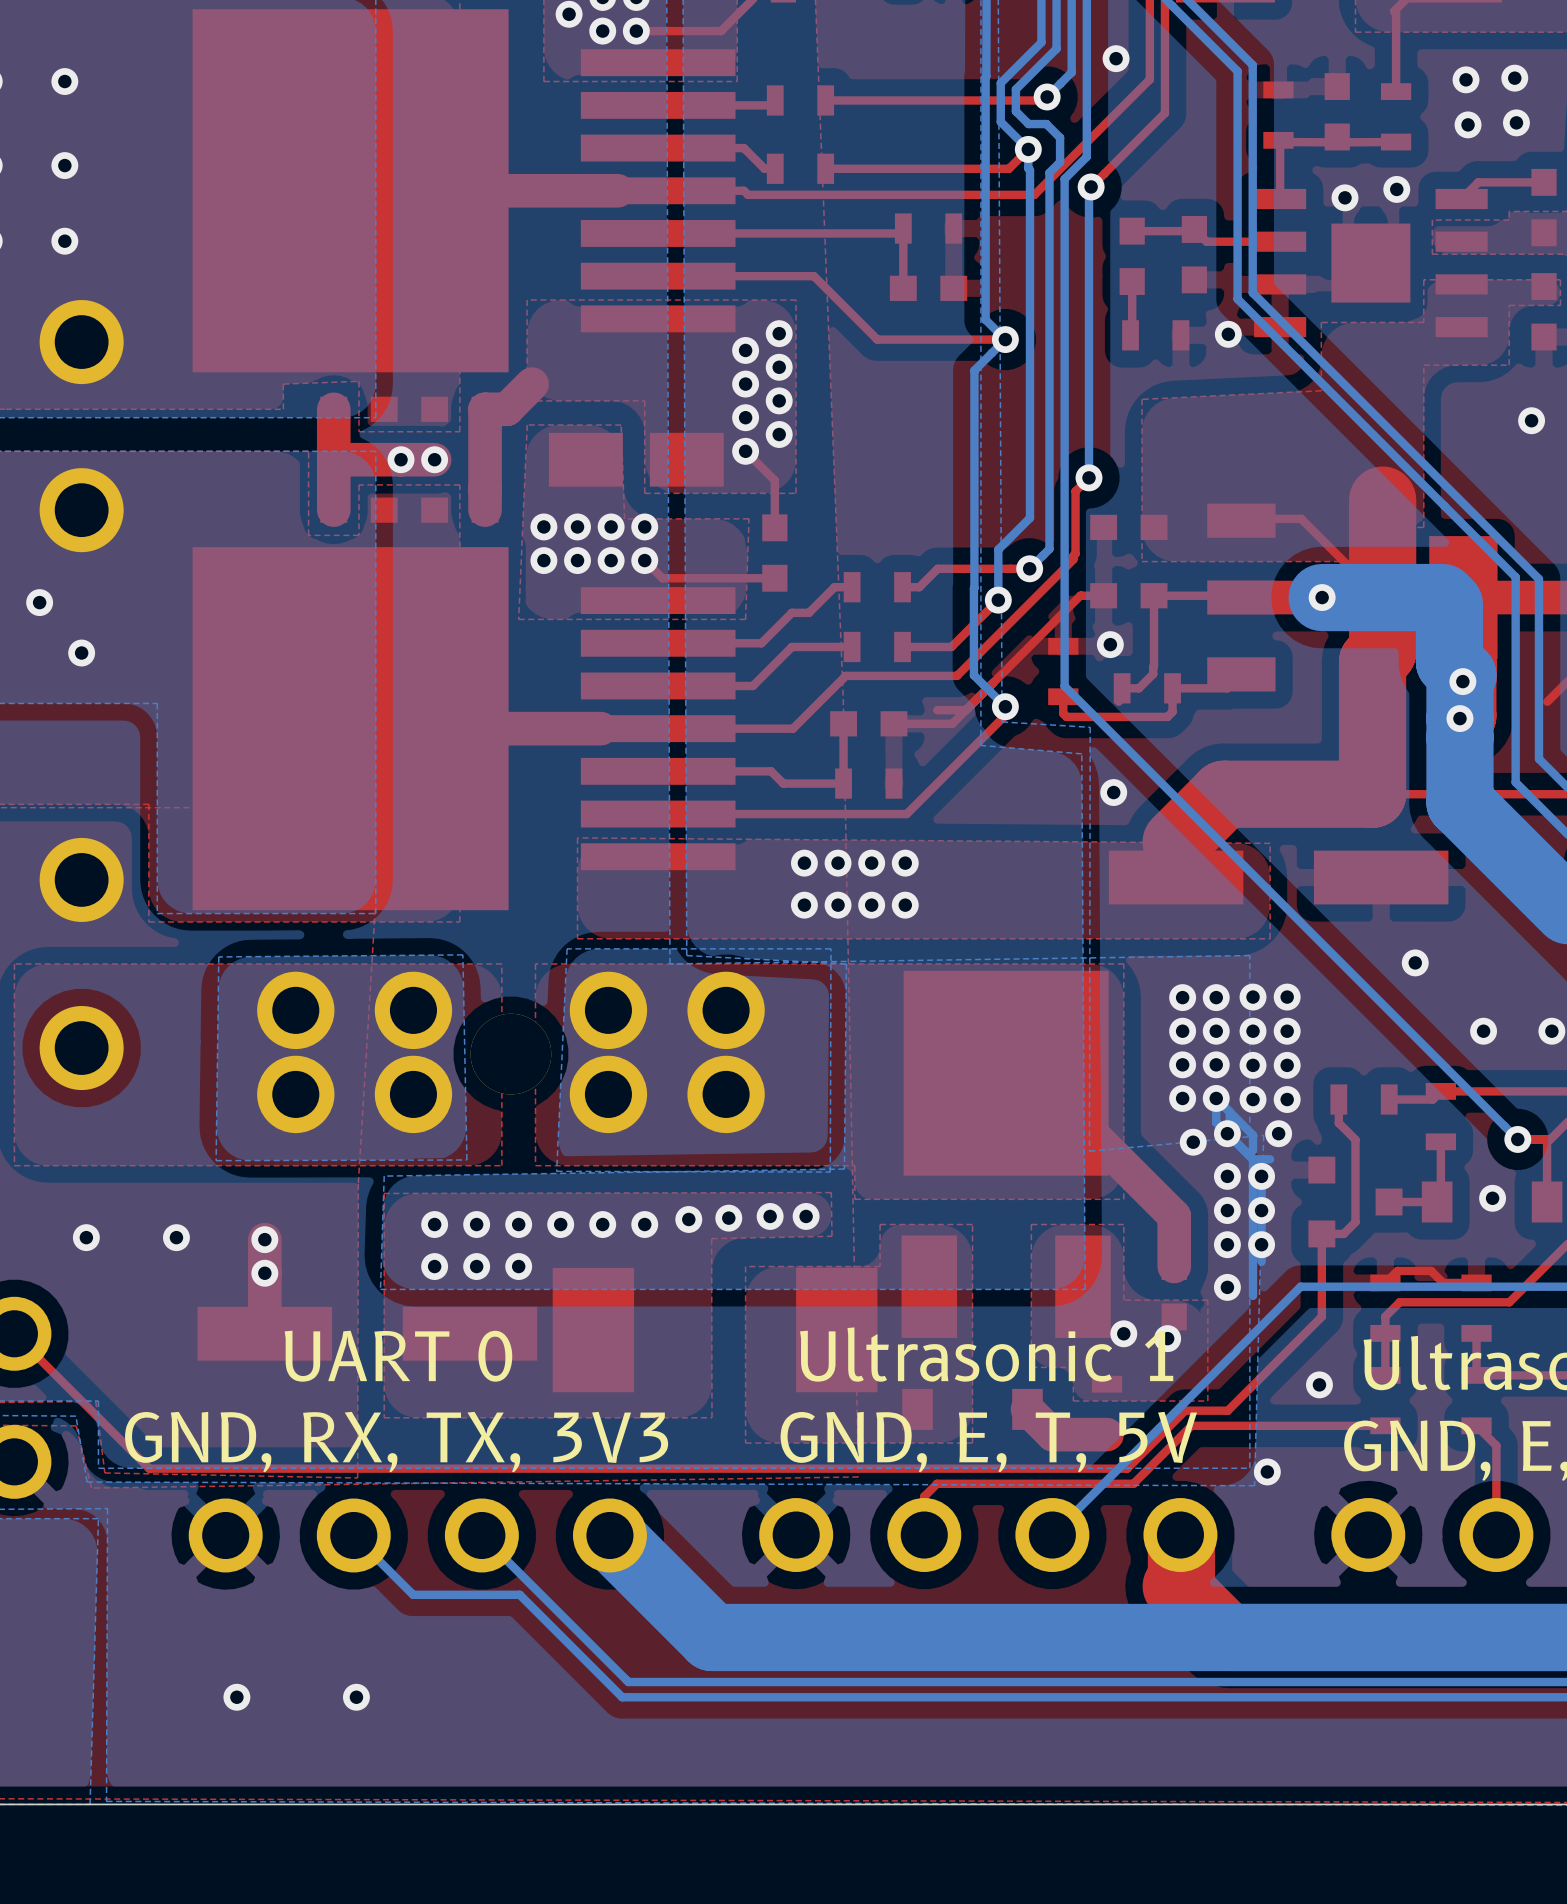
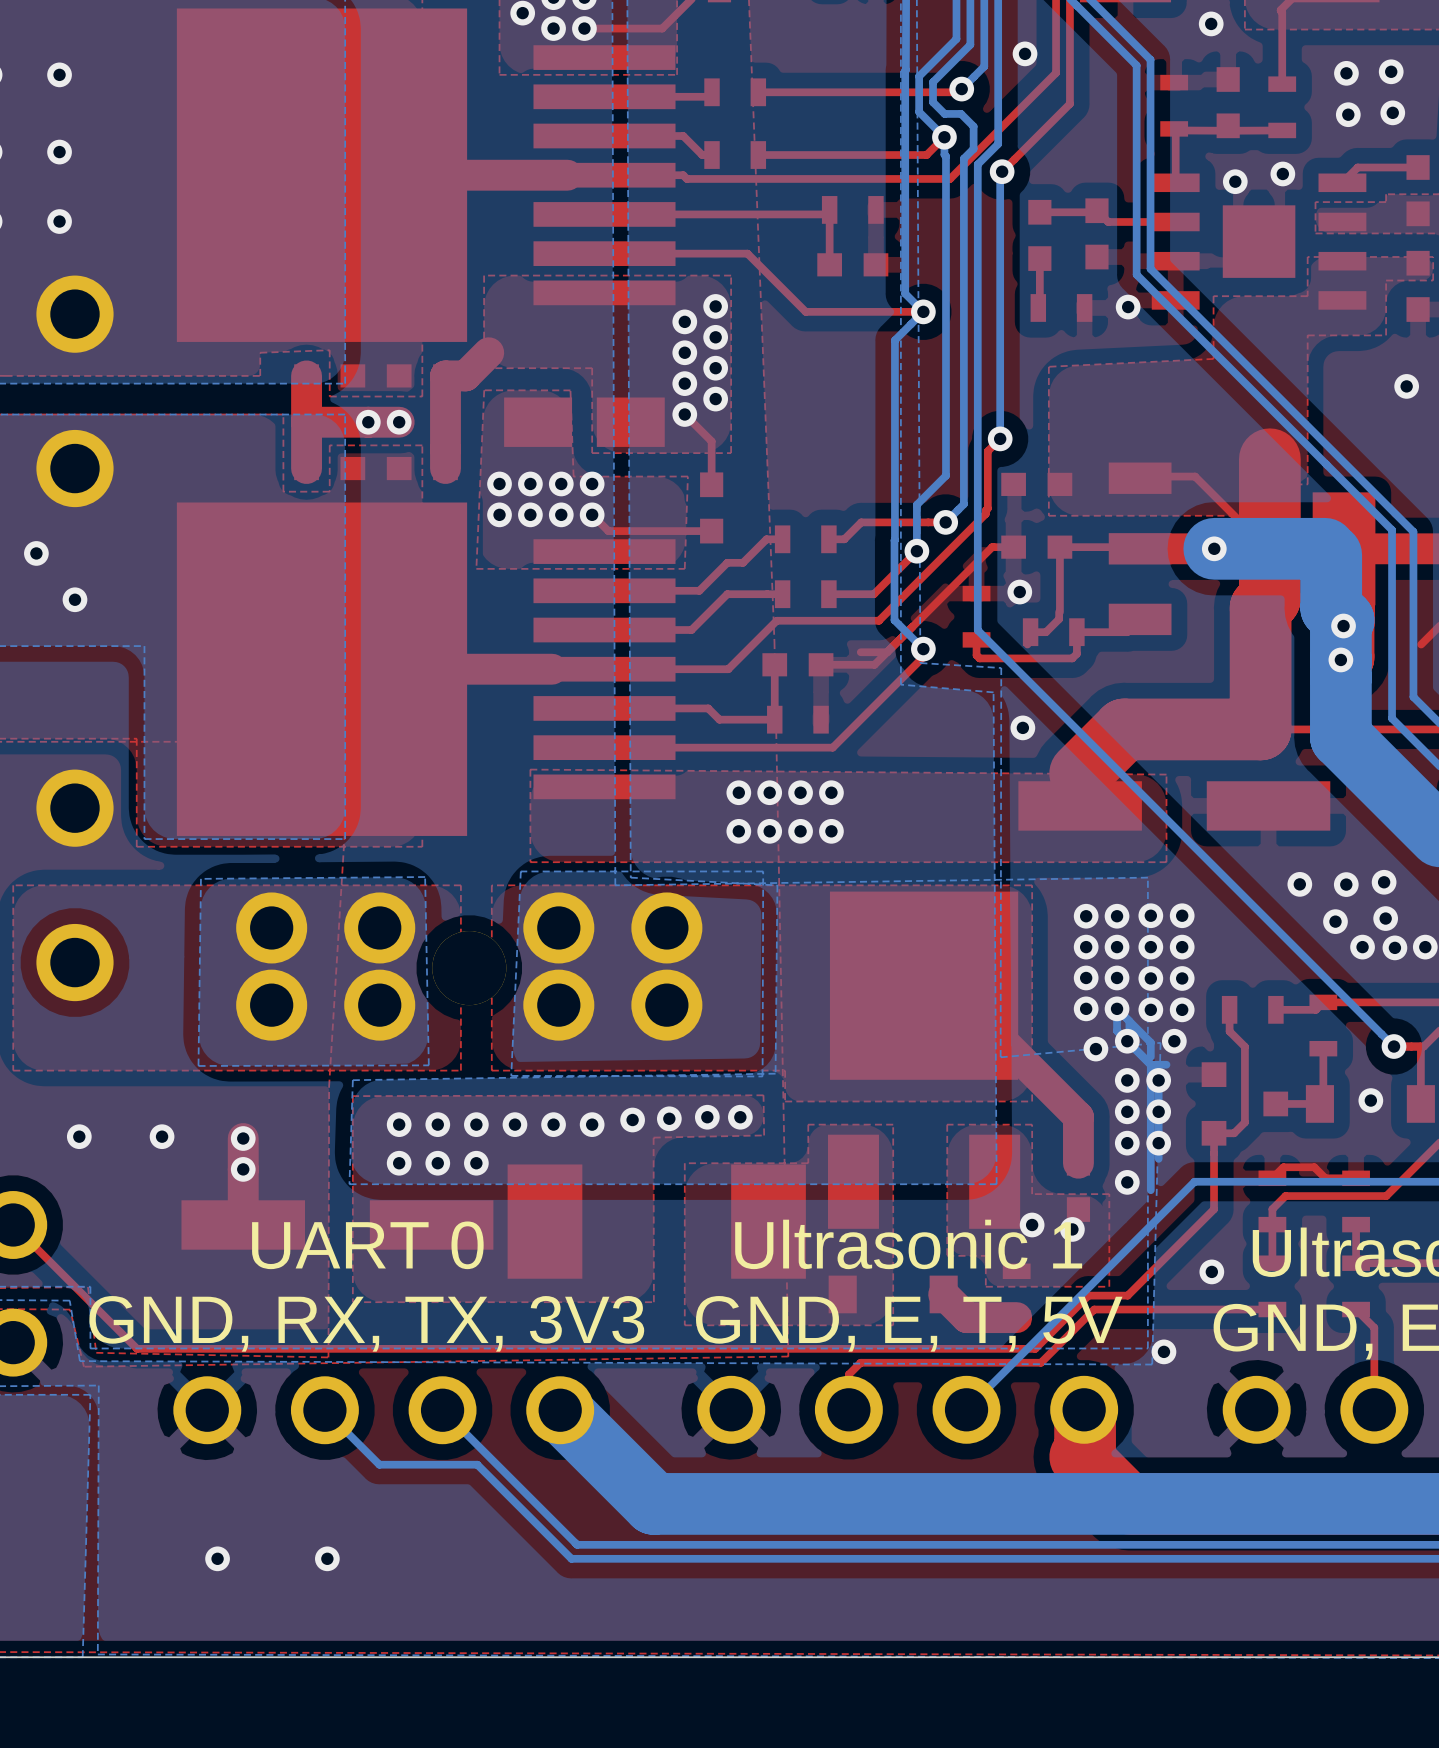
via: none -> (1211, 23)
via: none -> (1384, 882)
via: none -> (1346, 884)
via: none -> (1385, 918)
via: none -> (1335, 921)
via: none -> (1394, 947)

